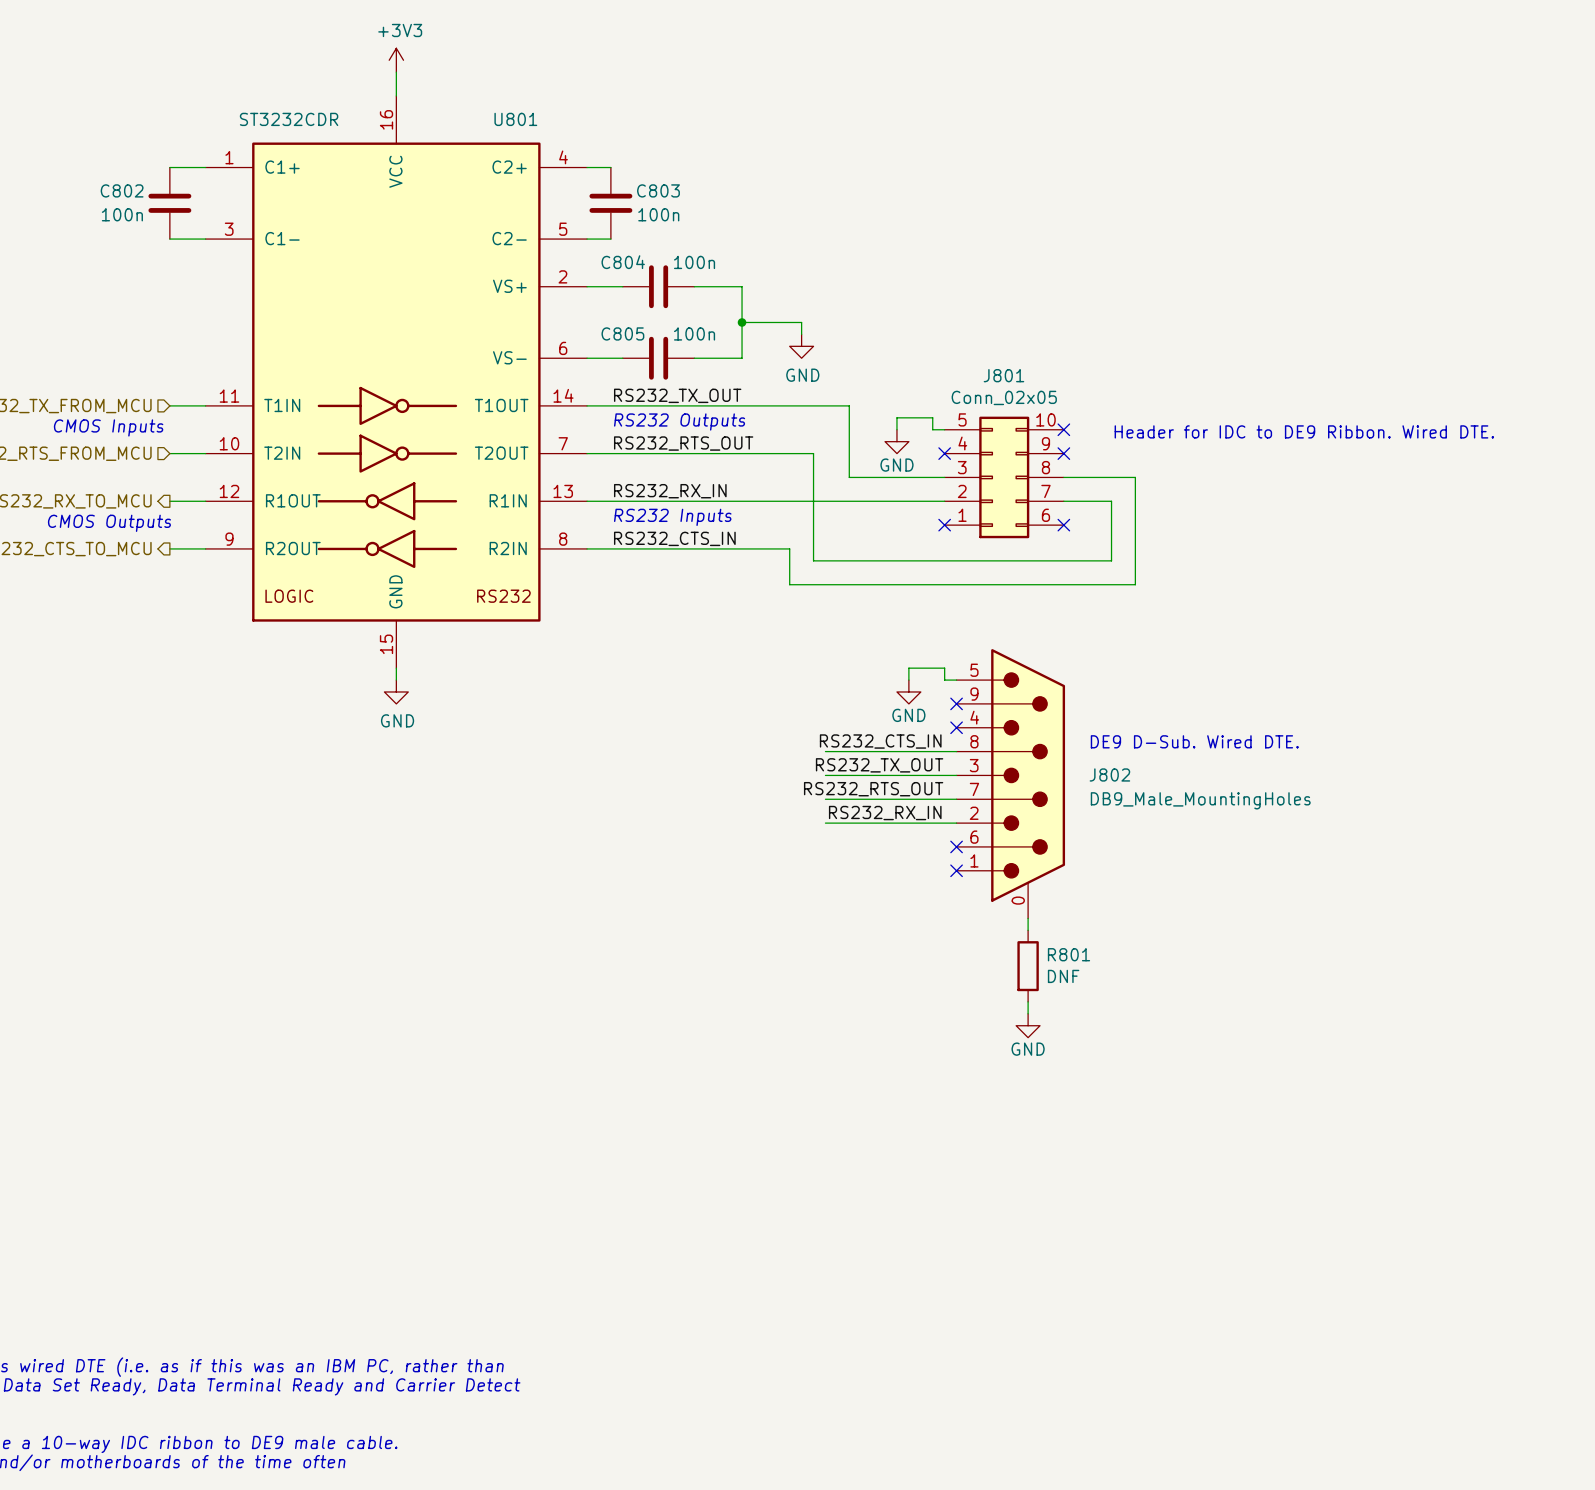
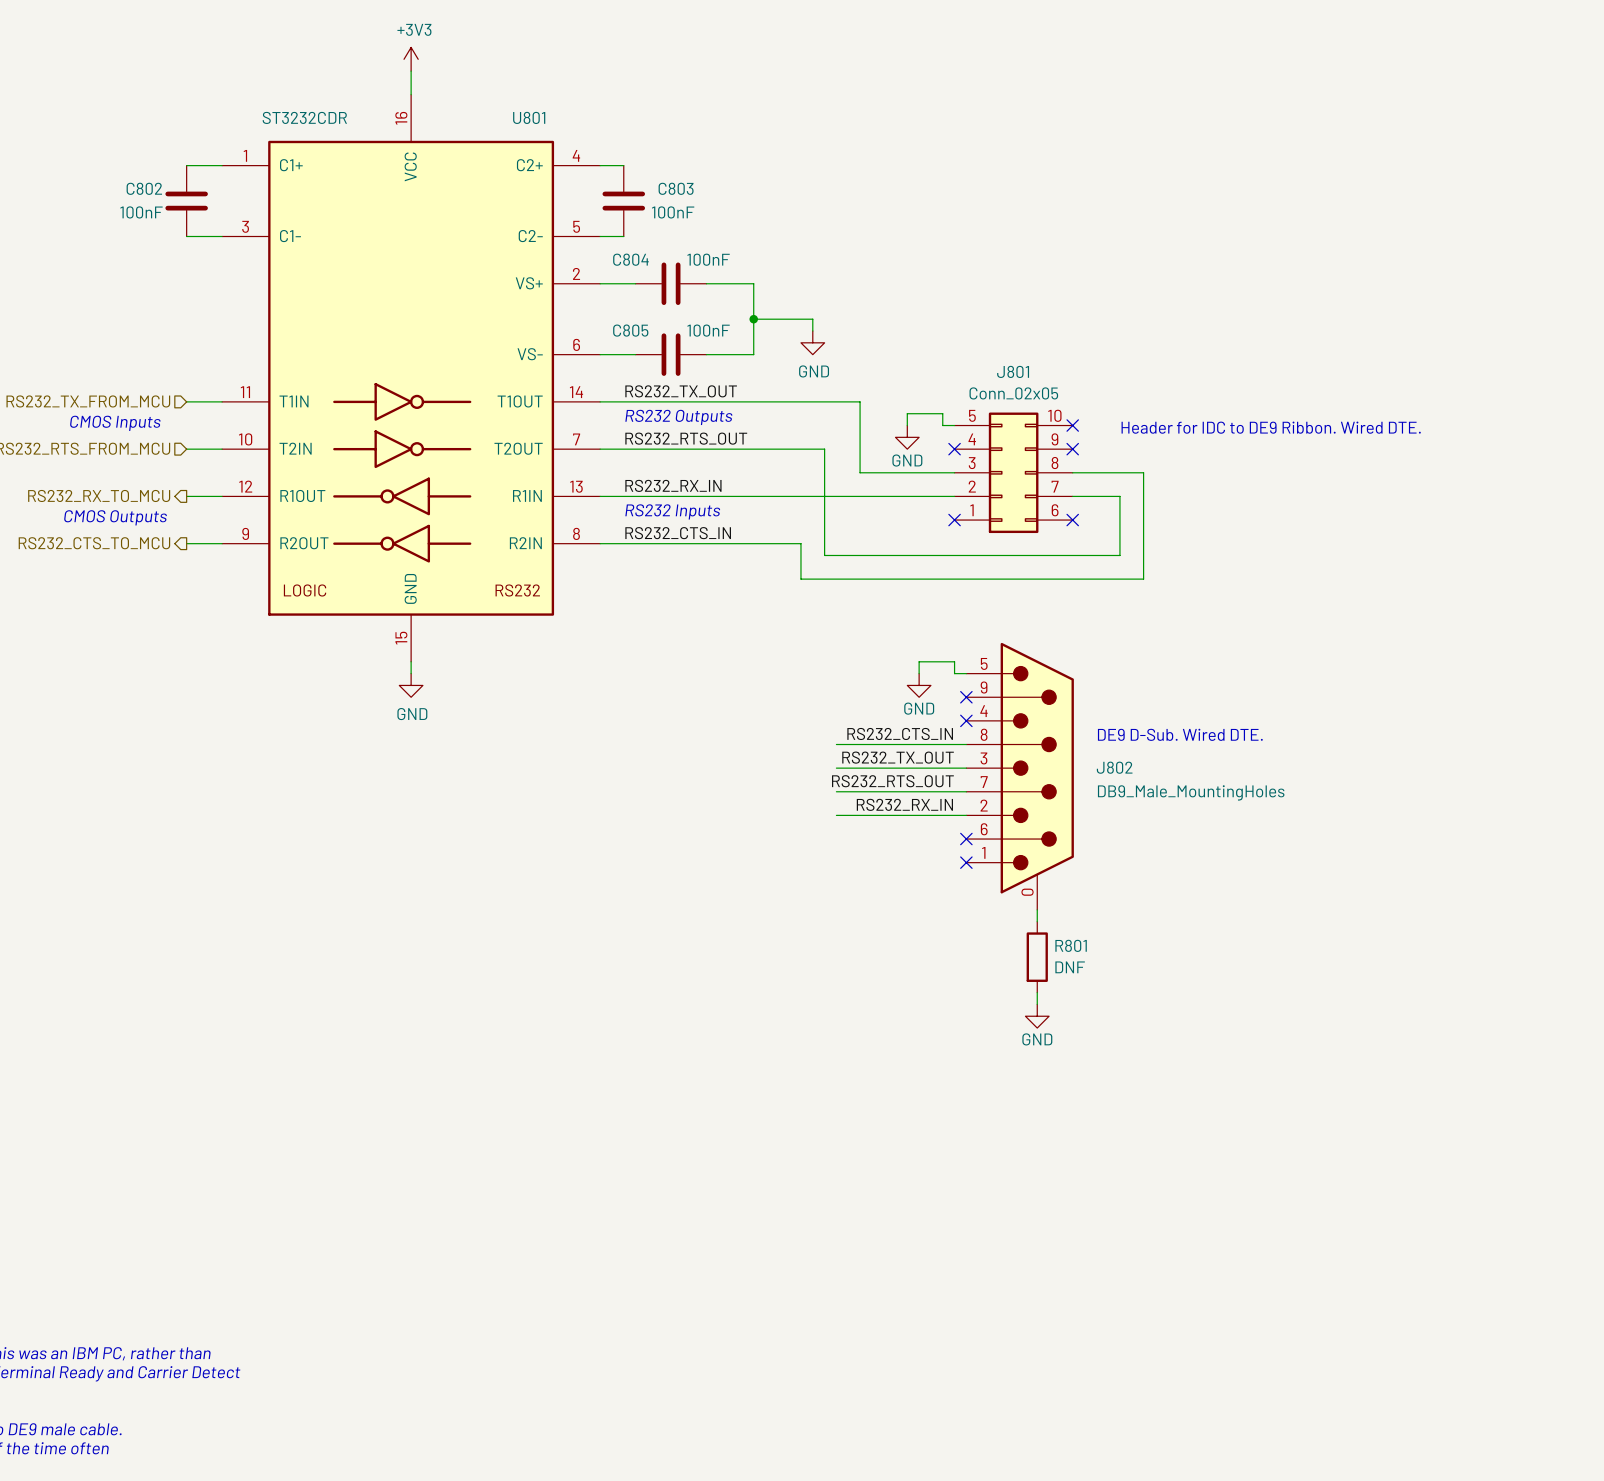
C802 value: 100n (122, 214) -> 100nF (141, 212)
C803 value: 100n (658, 214) -> 100nF (673, 212)
C804 value: 100n (694, 262) -> 100nF (708, 259)
C805 value: 100n (694, 333) -> 100nF (708, 330)

